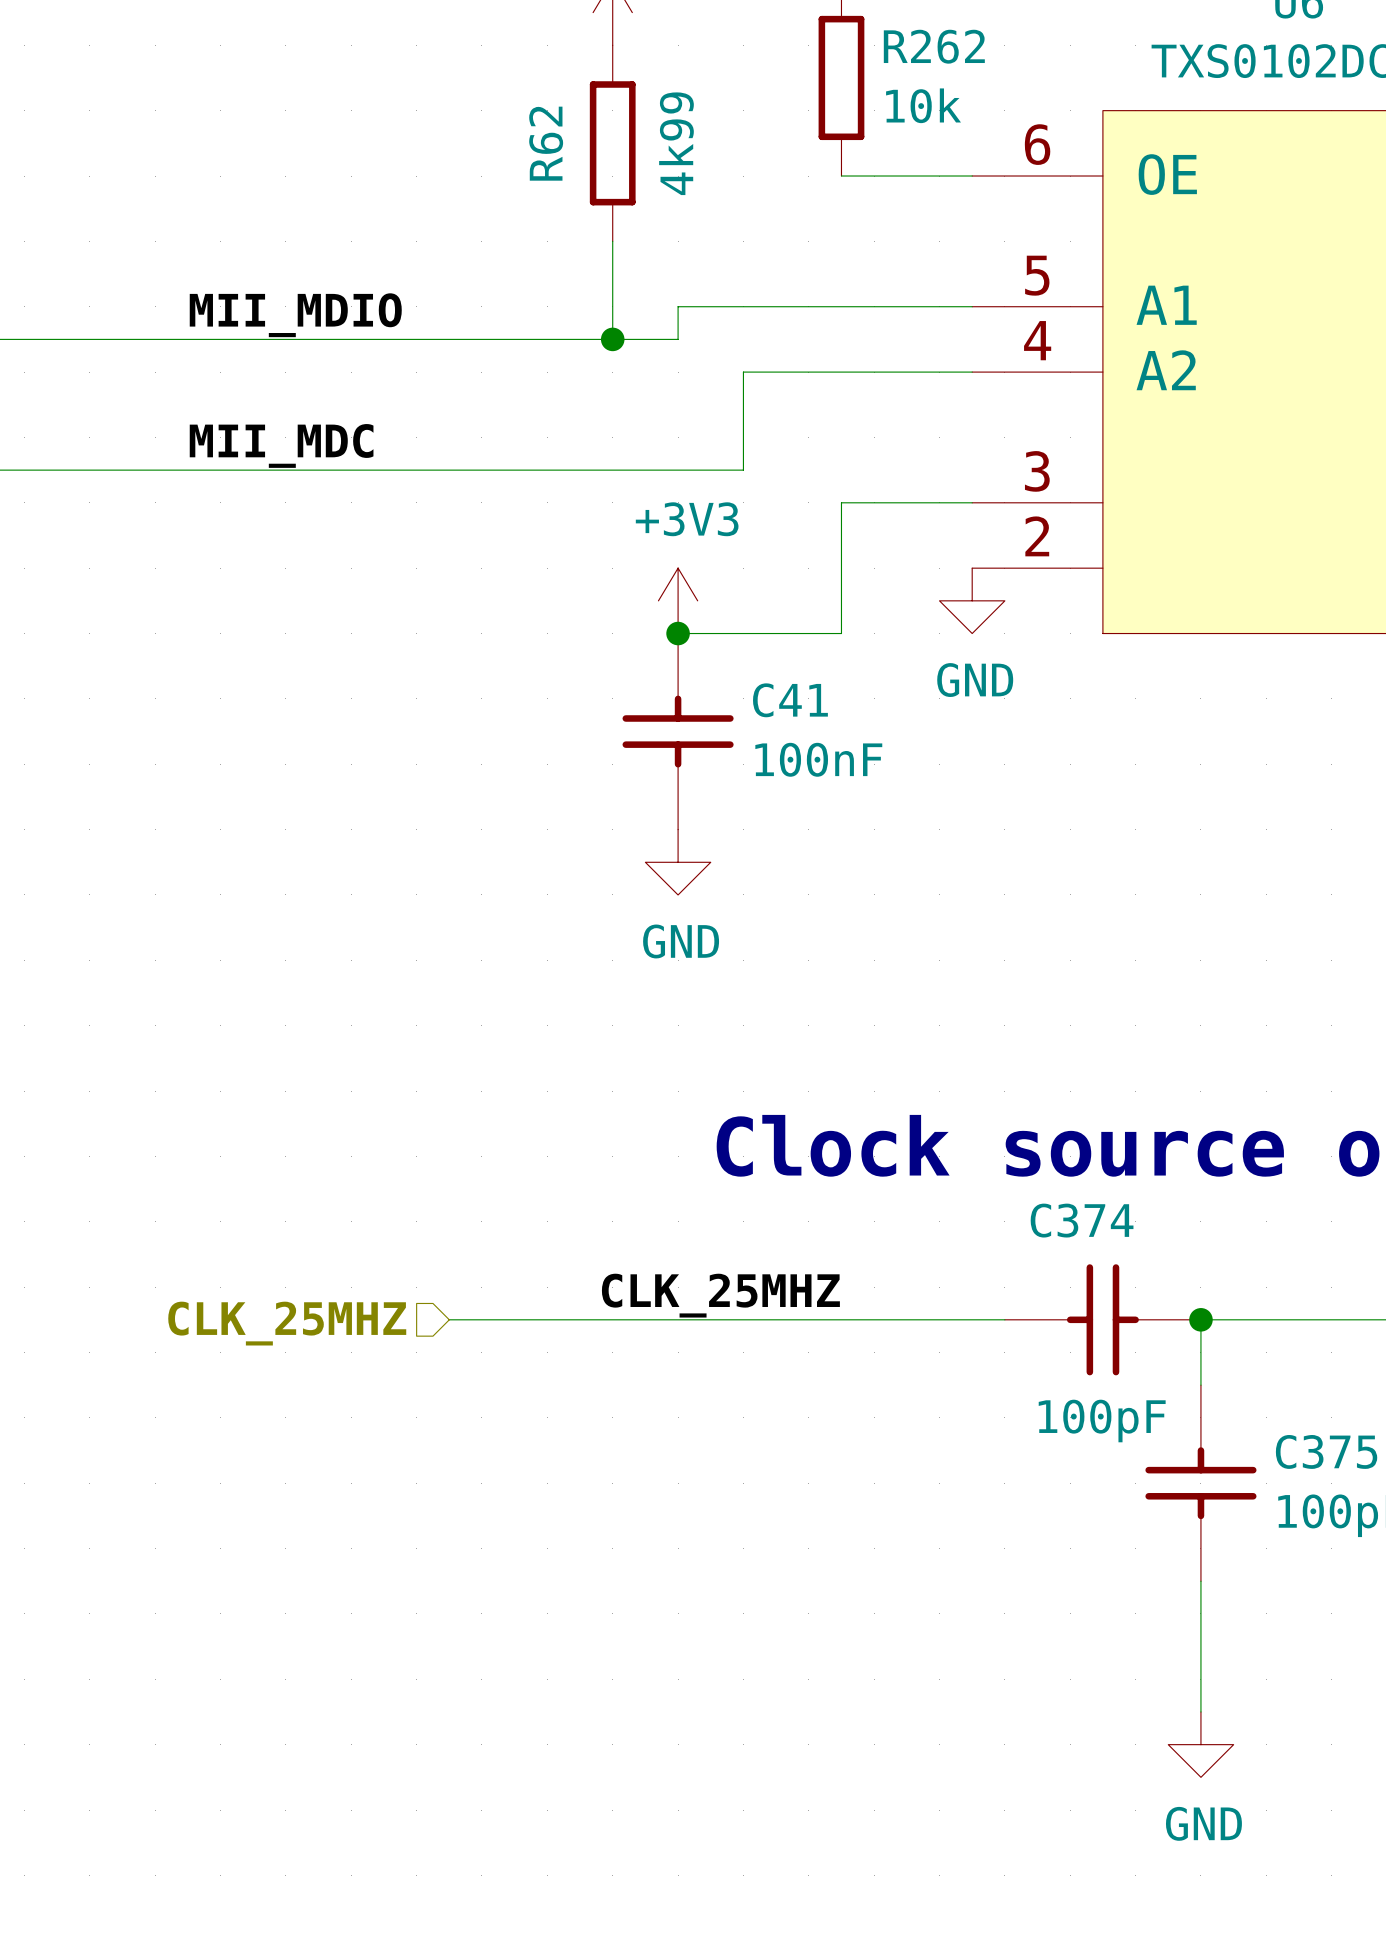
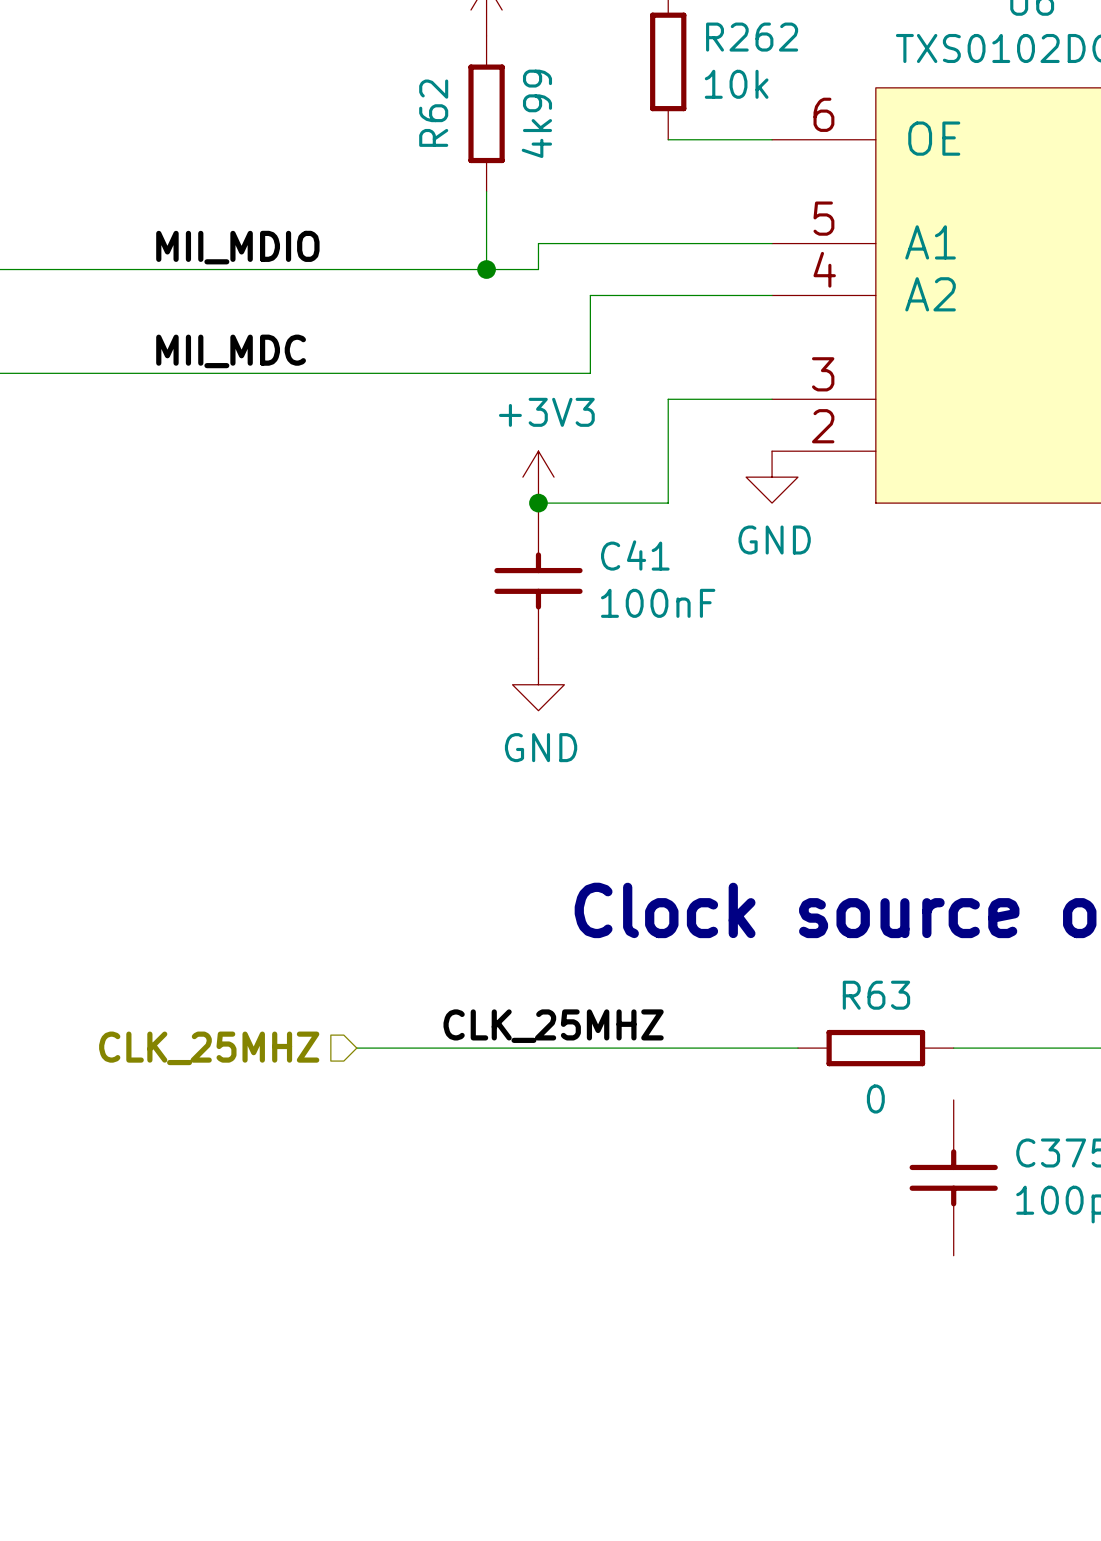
C374: (1102, 1319) -> none
R63: none -> (875, 1048)
wire: (1200, 1319) (1200, 1385) -> none
junction: (1200, 1319) -> none
wire: (1200, 1581) (1200, 1711) -> none
power symbol: GND (1200, 1744) -> none

